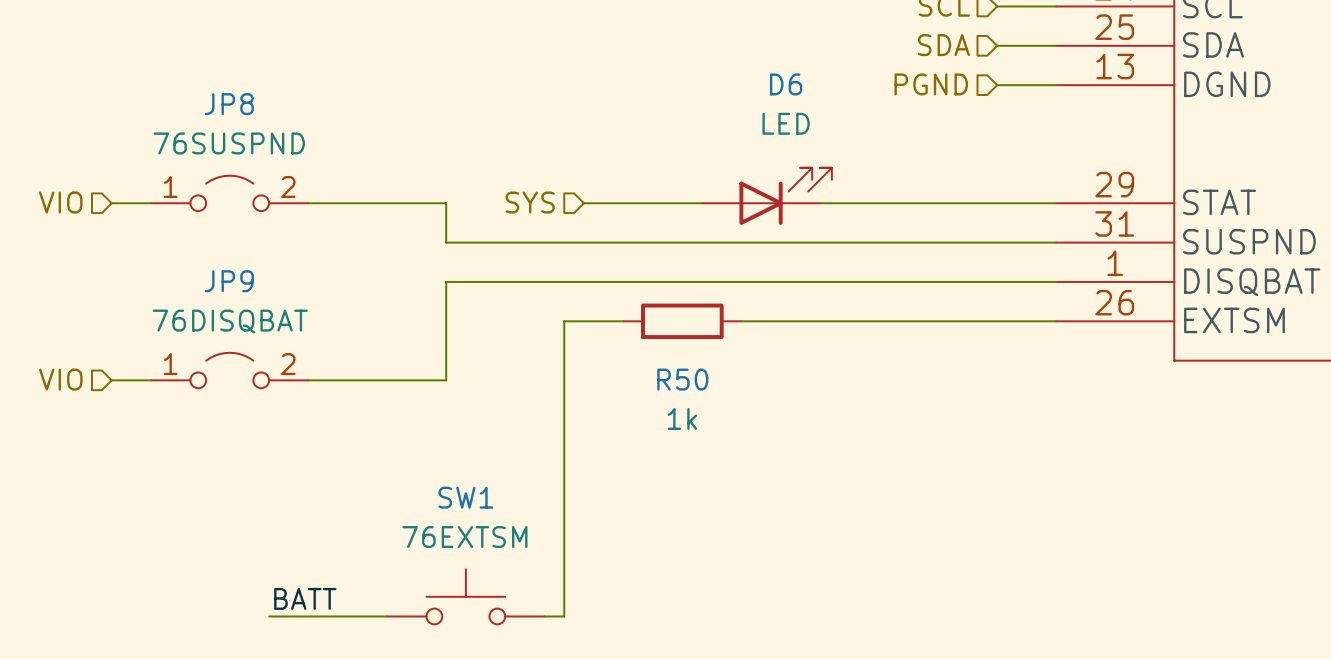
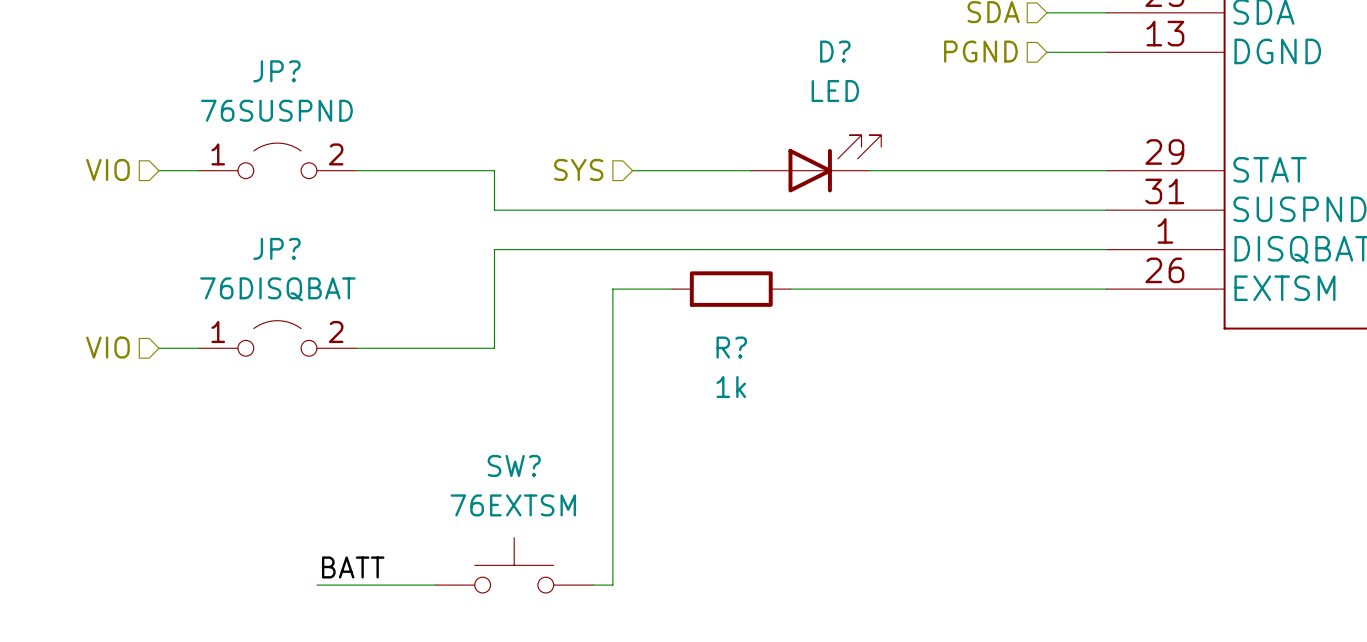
D6 name: D6 (786, 84) -> D? (835, 51)
JP8 name: JP8 (229, 104) -> JP? (276, 71)
JP9 name: JP9 (229, 281) -> JP? (276, 248)
R50 name: R50 (682, 379) -> R? (731, 347)
SW1 name: SW1 (465, 497) -> SW? (514, 465)

